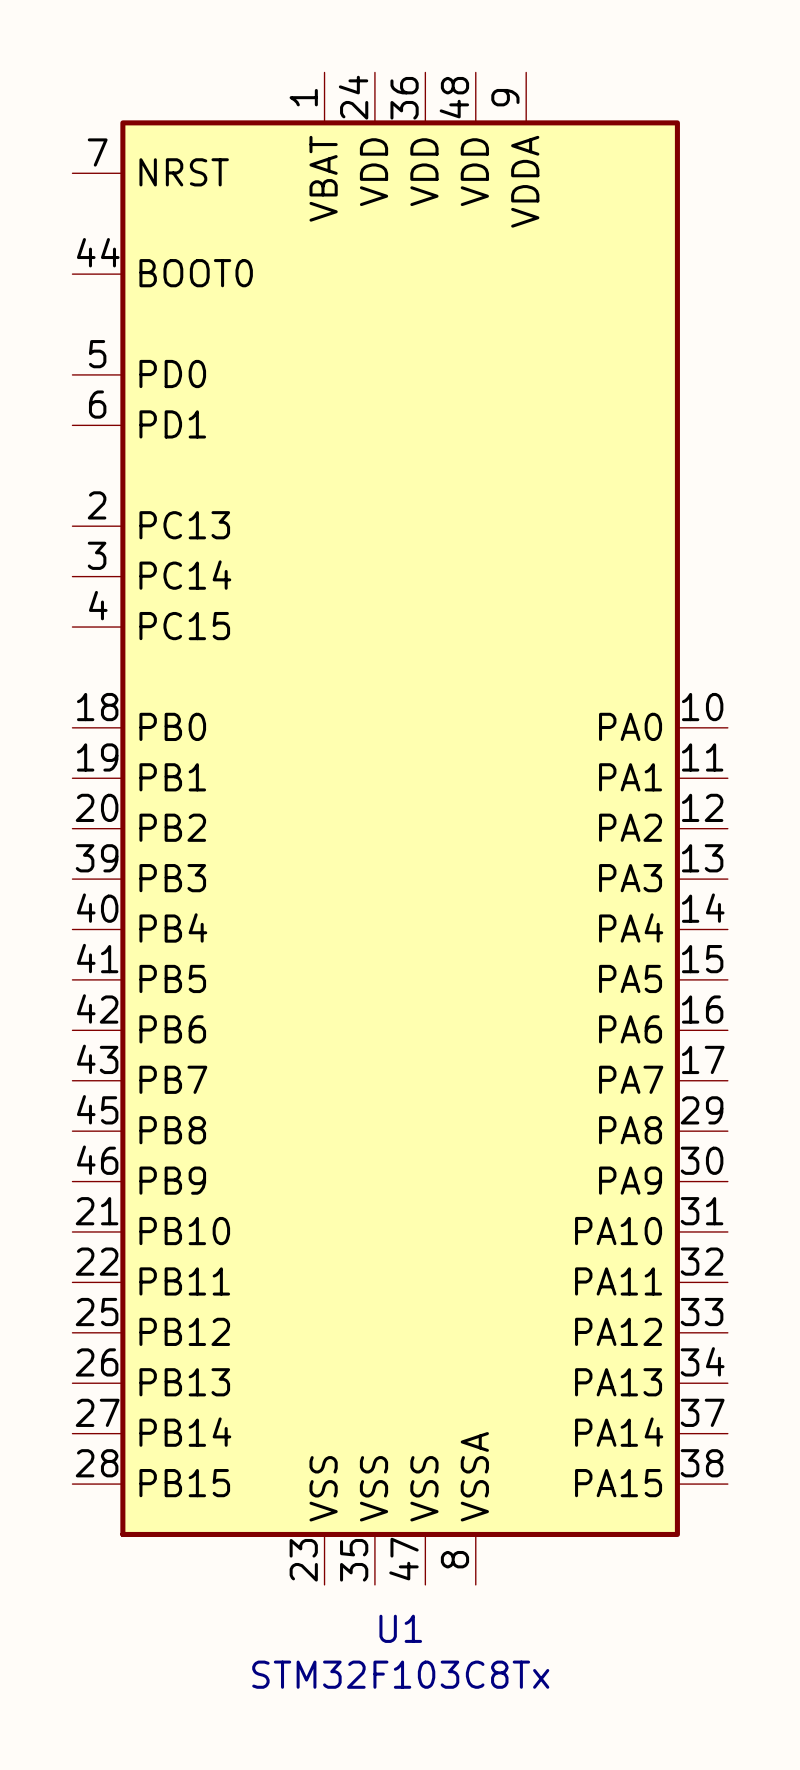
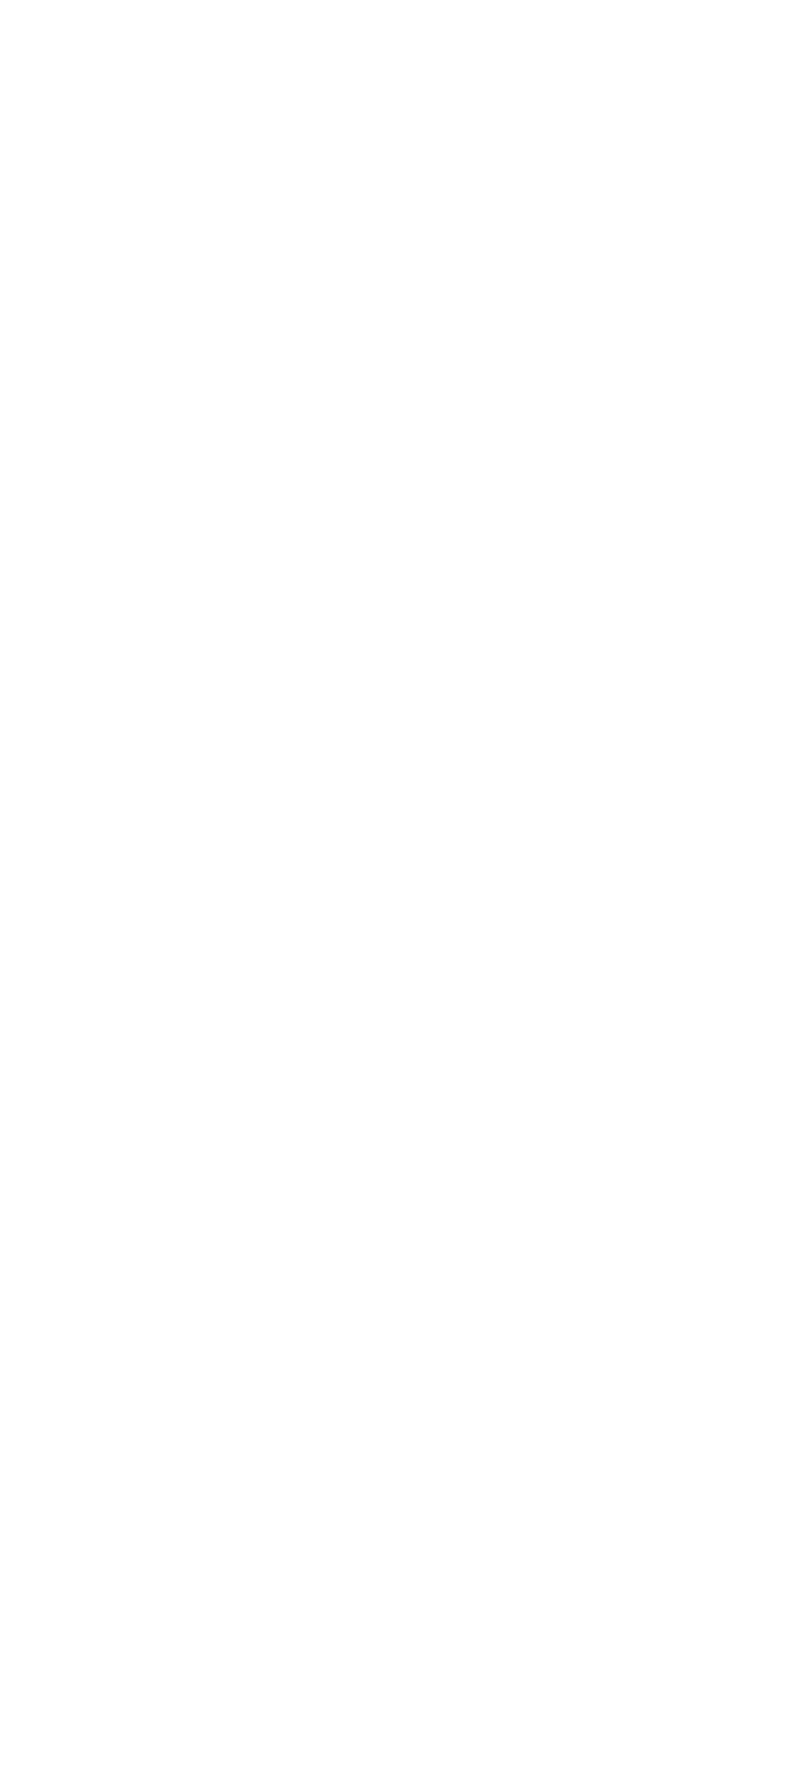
U1: STM32F103C8Tx (400, 828) -> none

